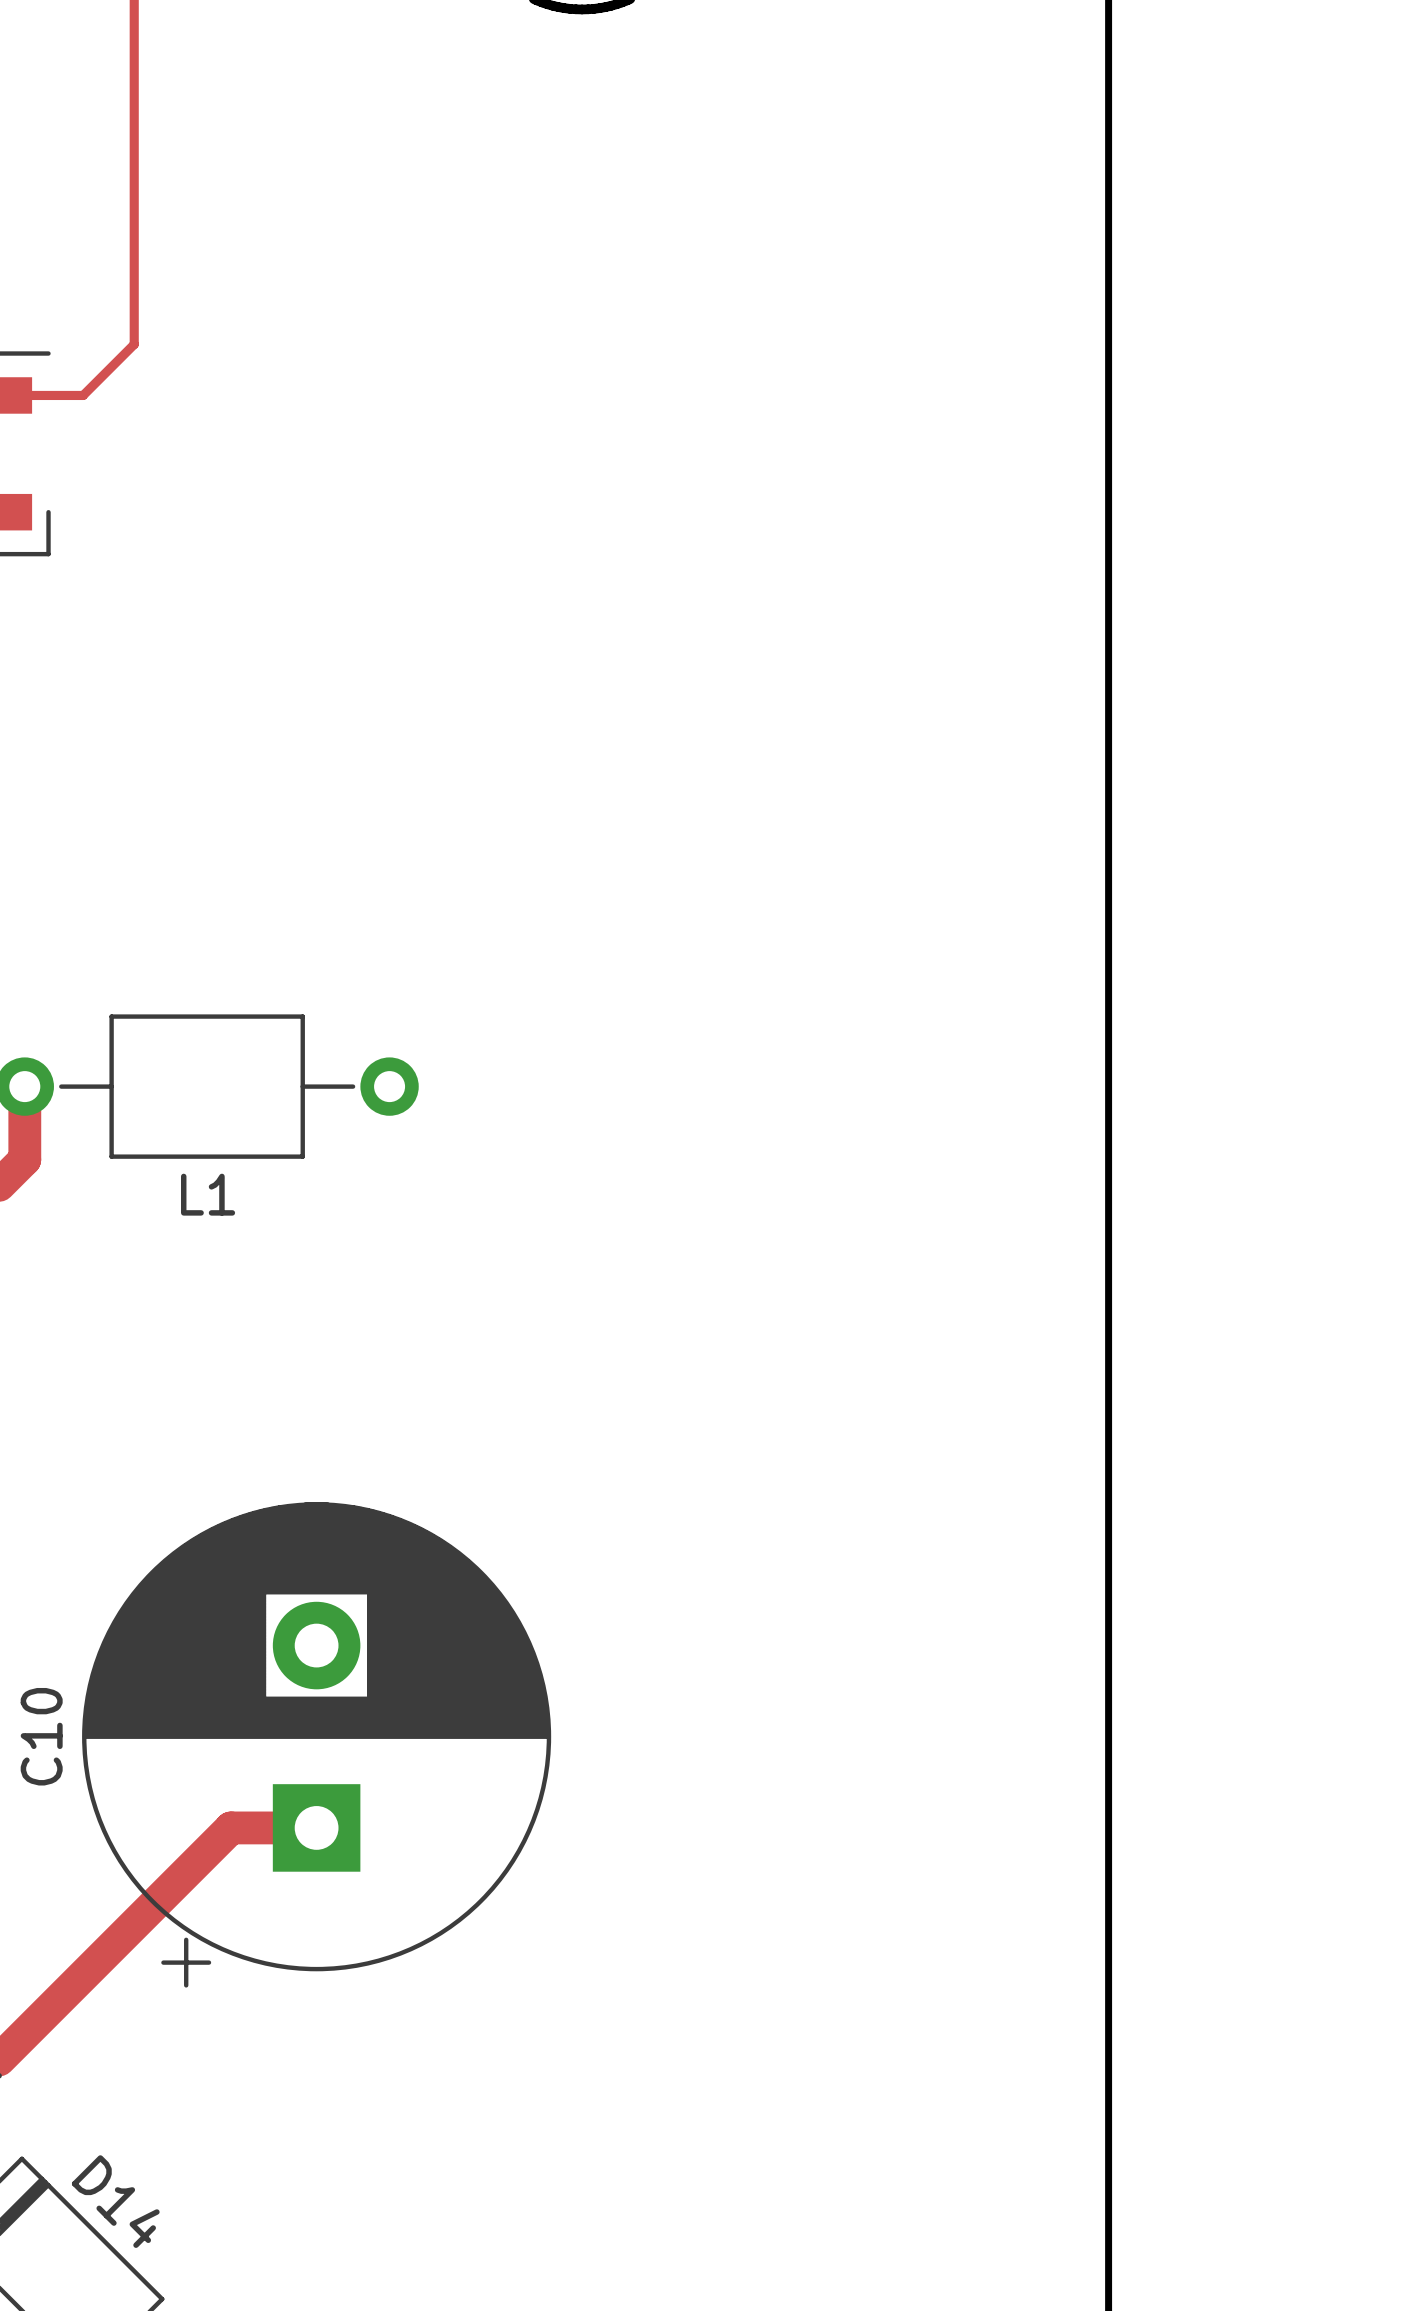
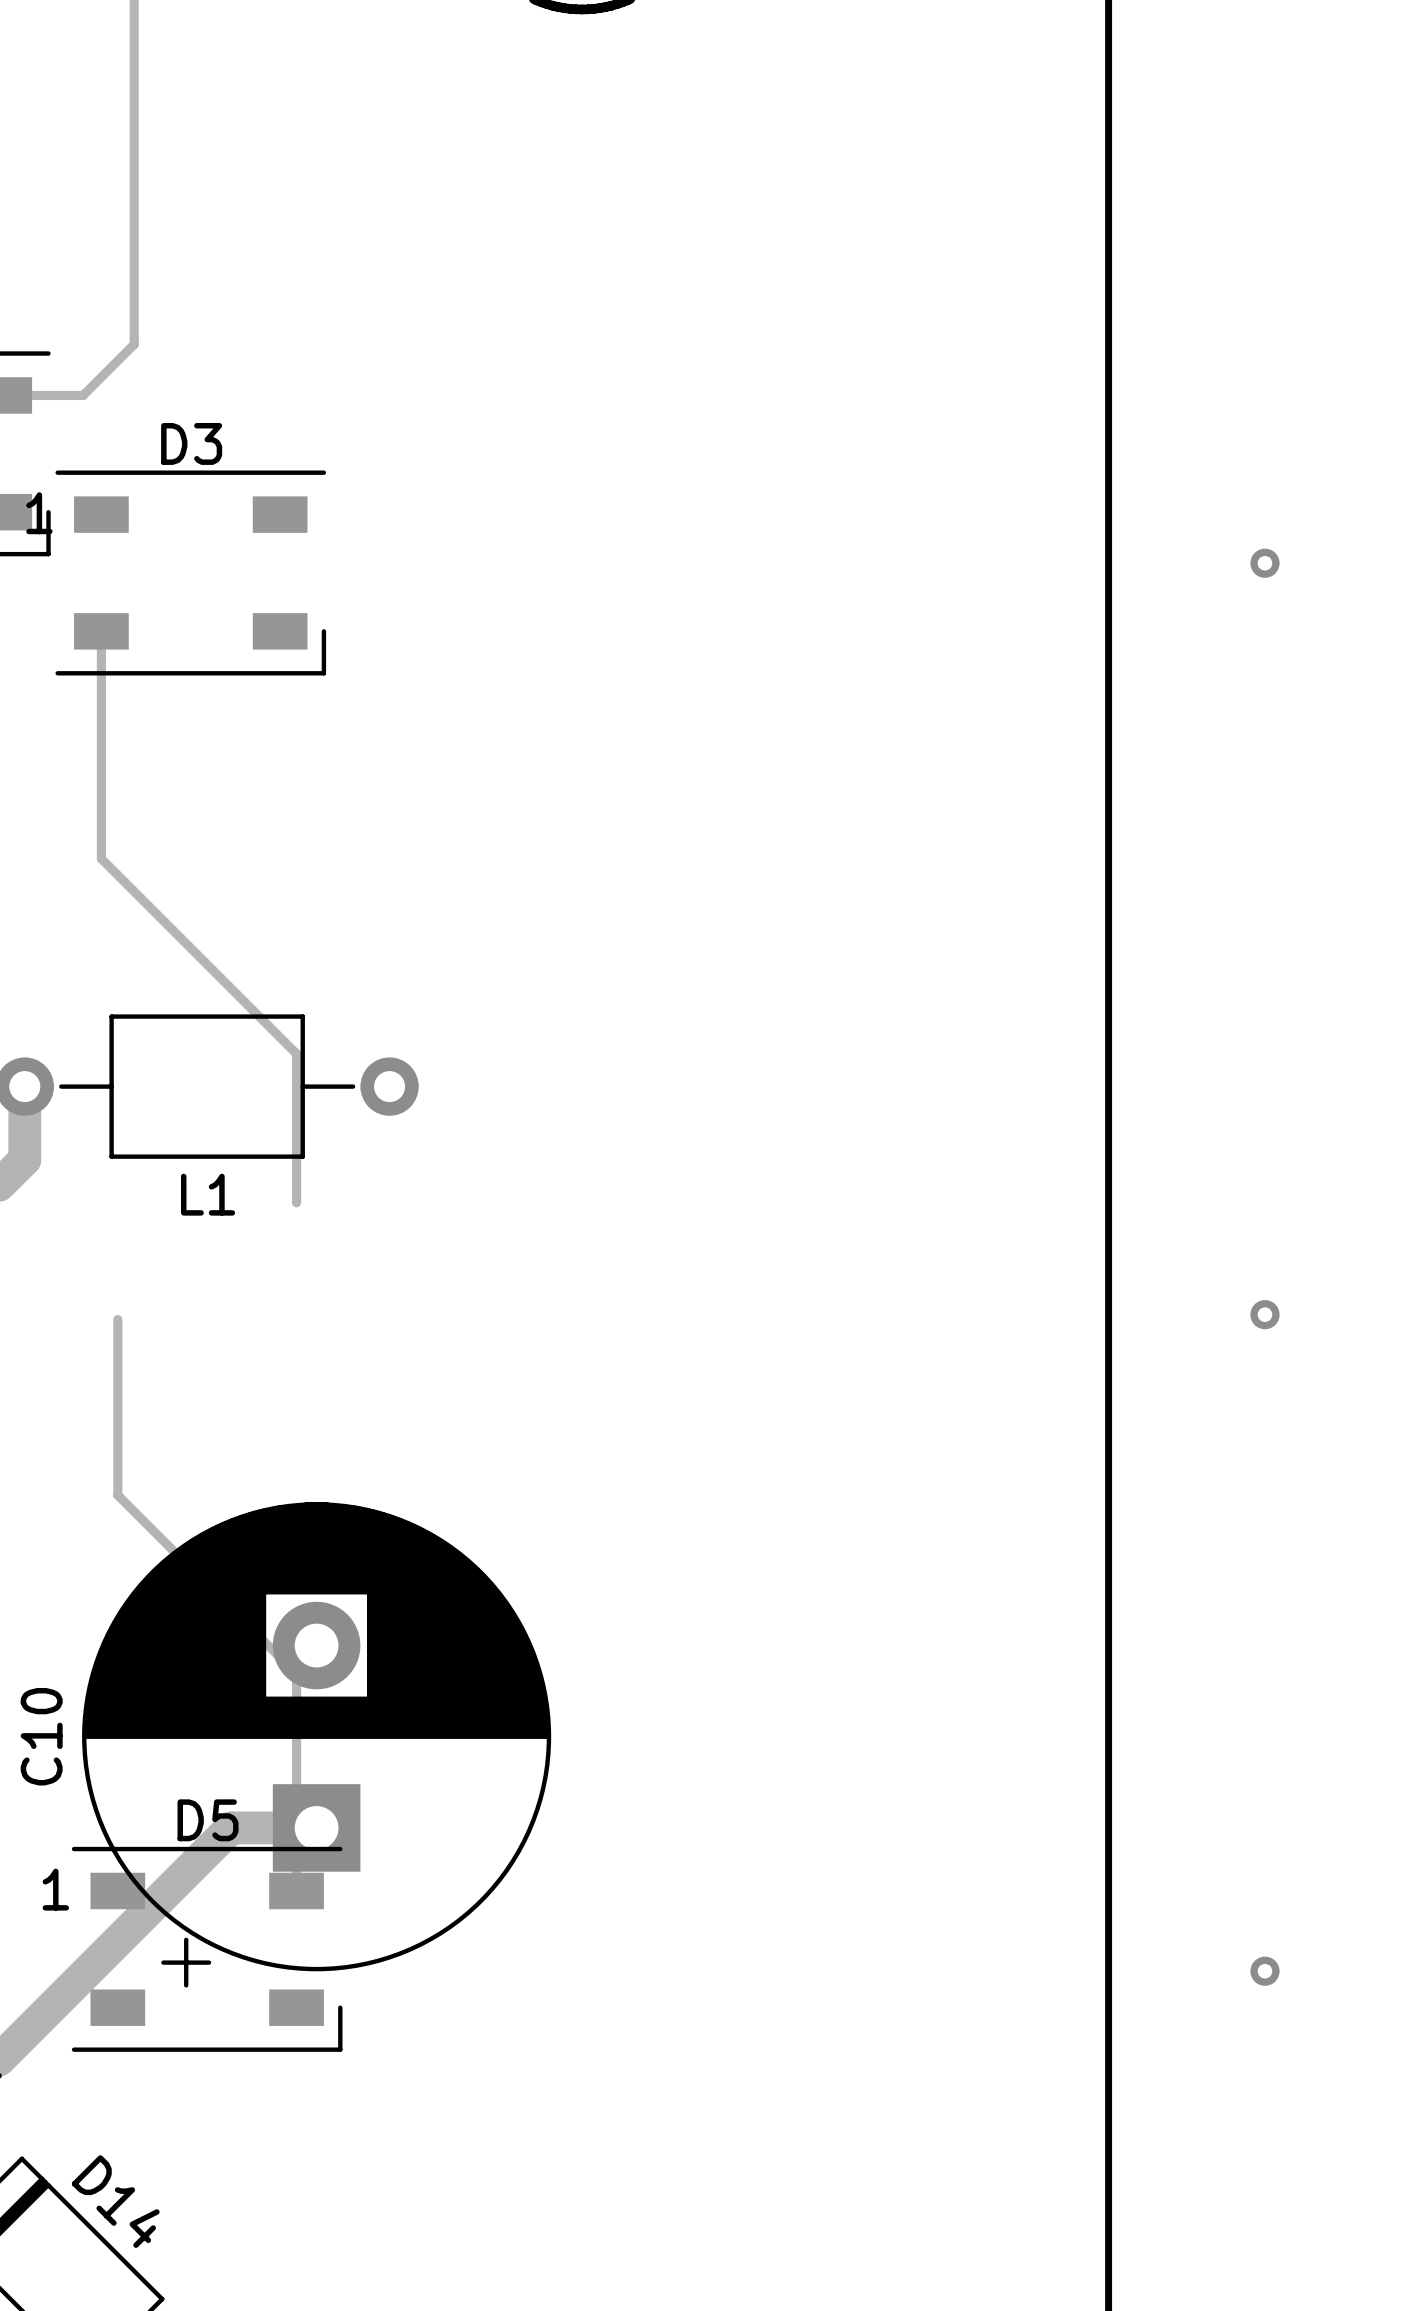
via: none -> (1264, 563)
D3: none -> (190, 572)
track: none -> (101, 631) (101, 858) (296, 1053) (296, 1202)
via: none -> (1264, 1314)
track: none -> (117, 1319) (117, 1495) (296, 1673) (296, 1890)
D5: none -> (207, 1949)
via: none -> (1264, 1971)

